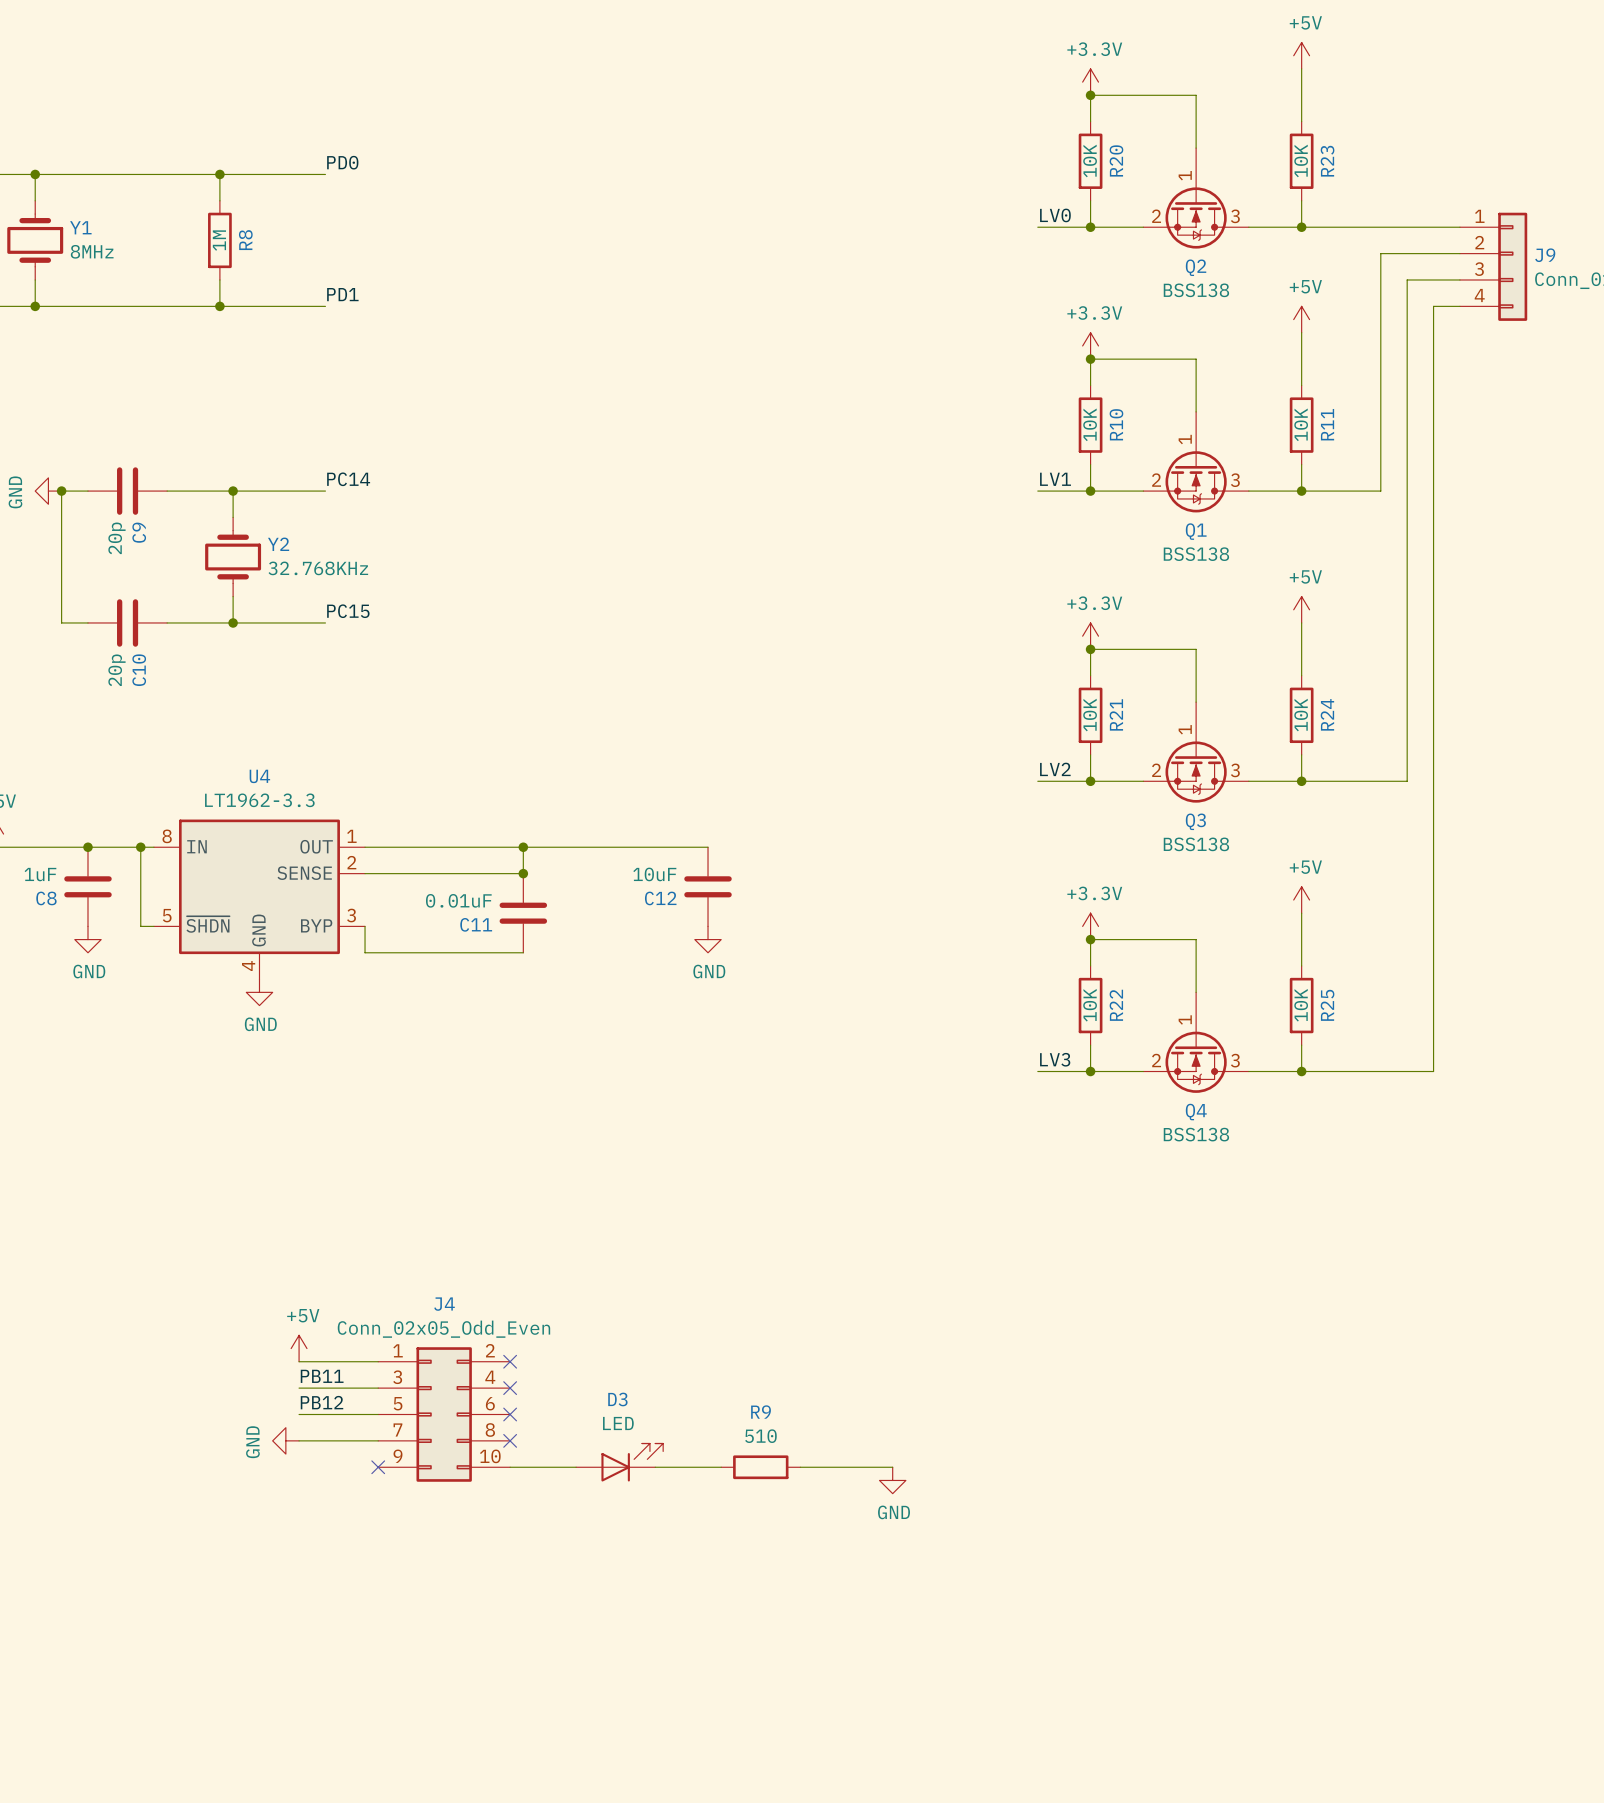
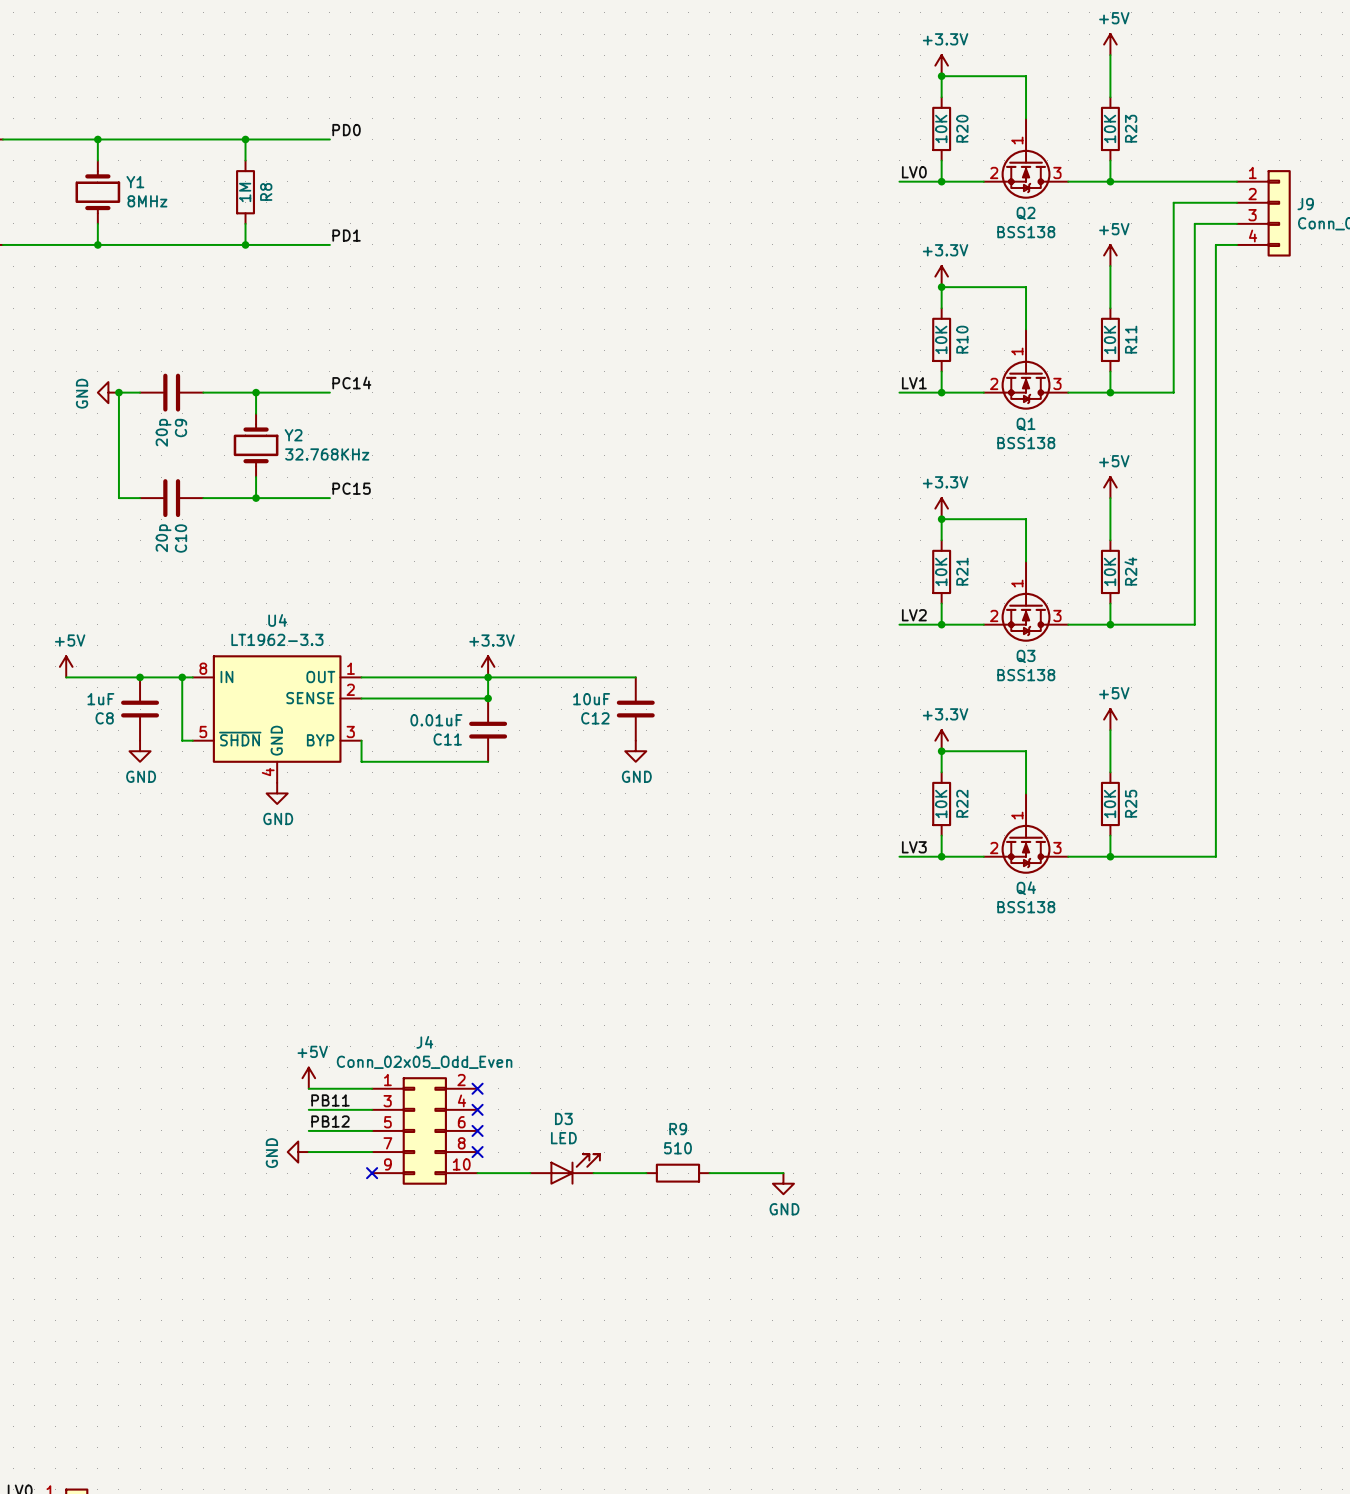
power symbol: none -> +3.3V (488, 666)

